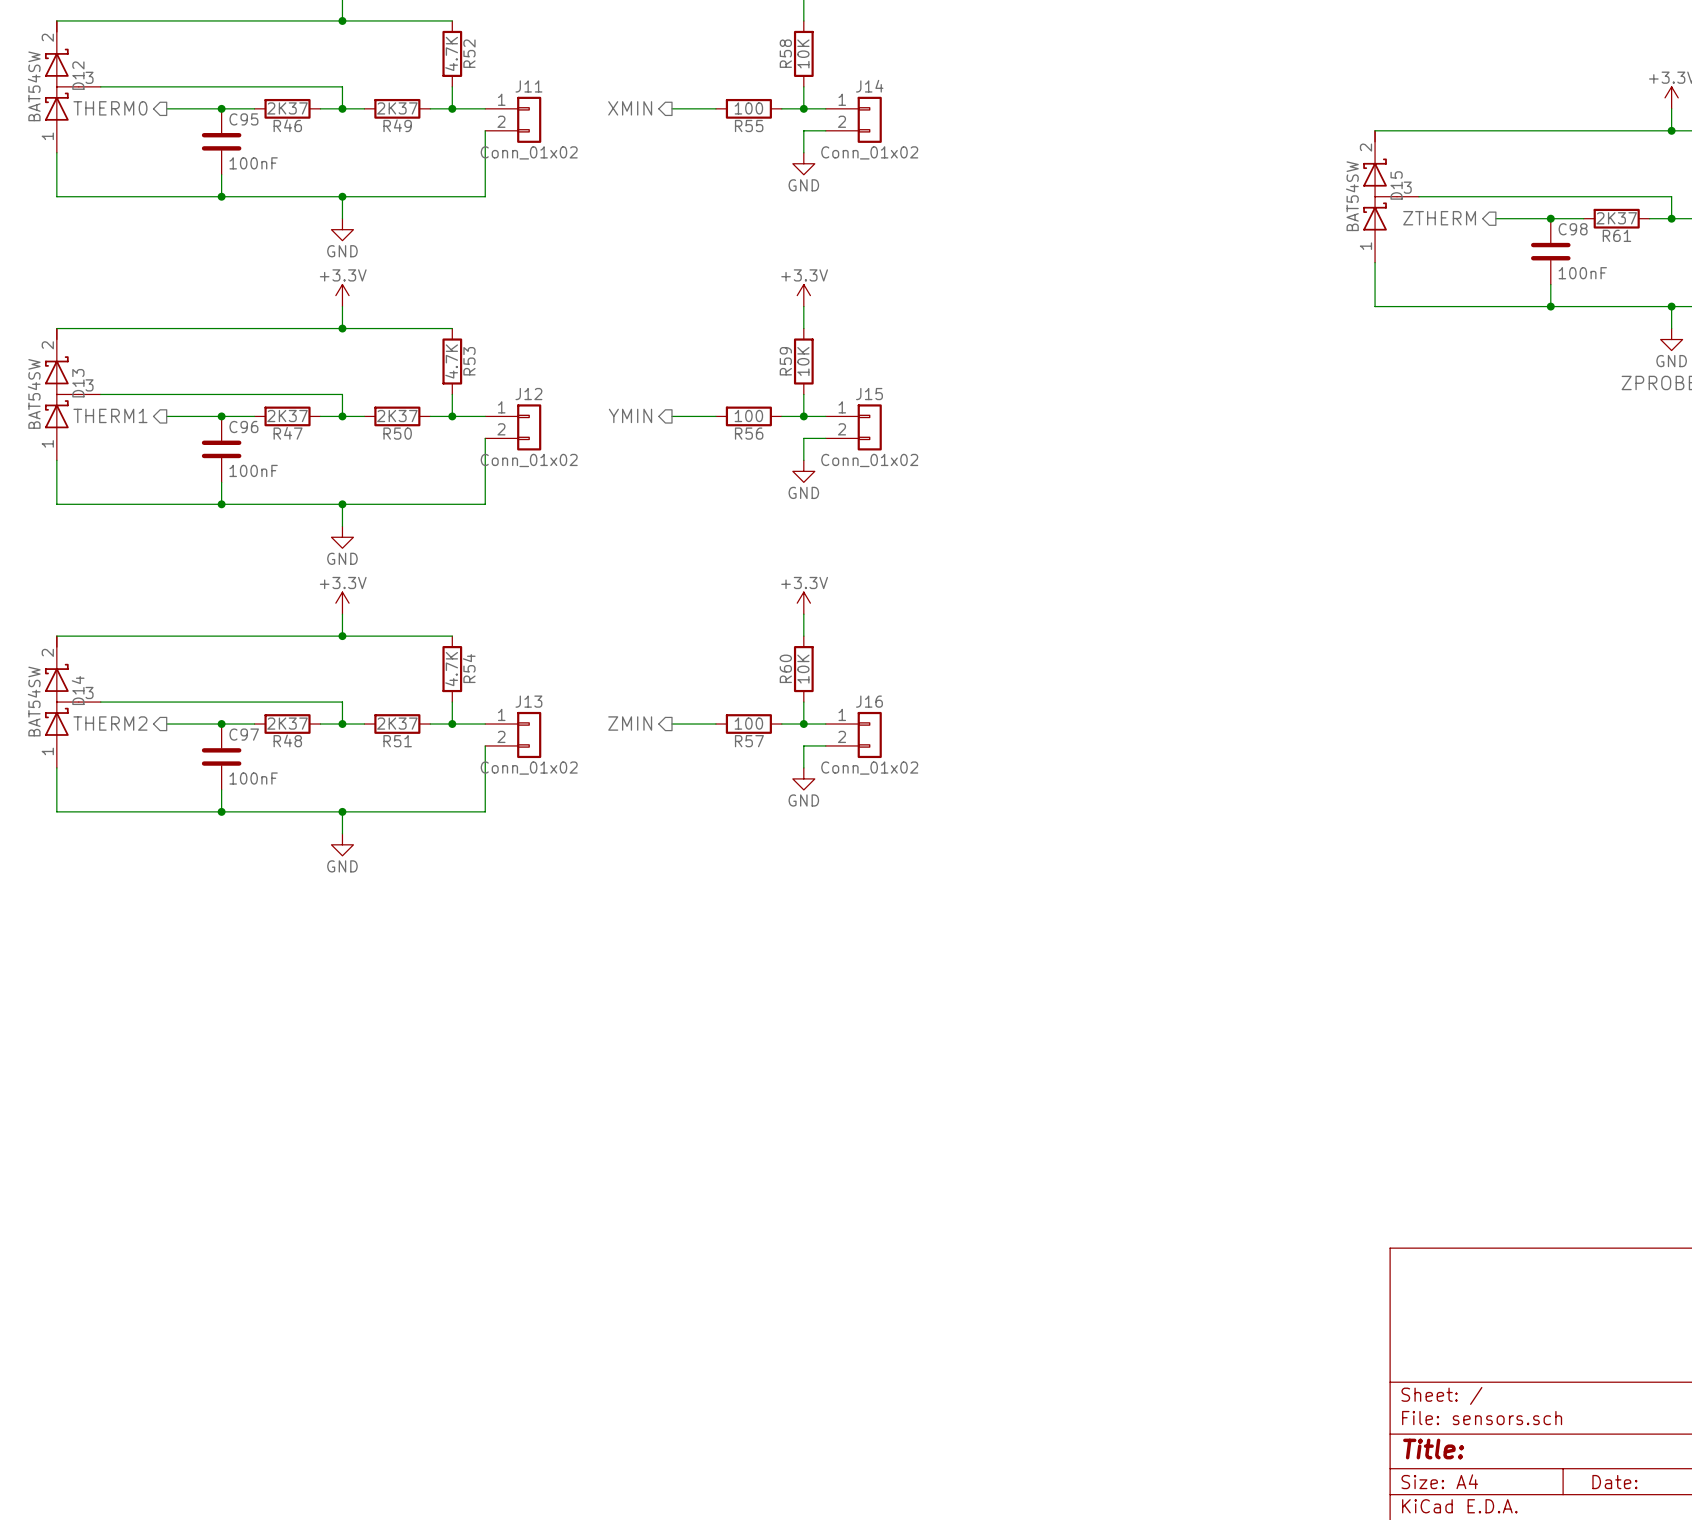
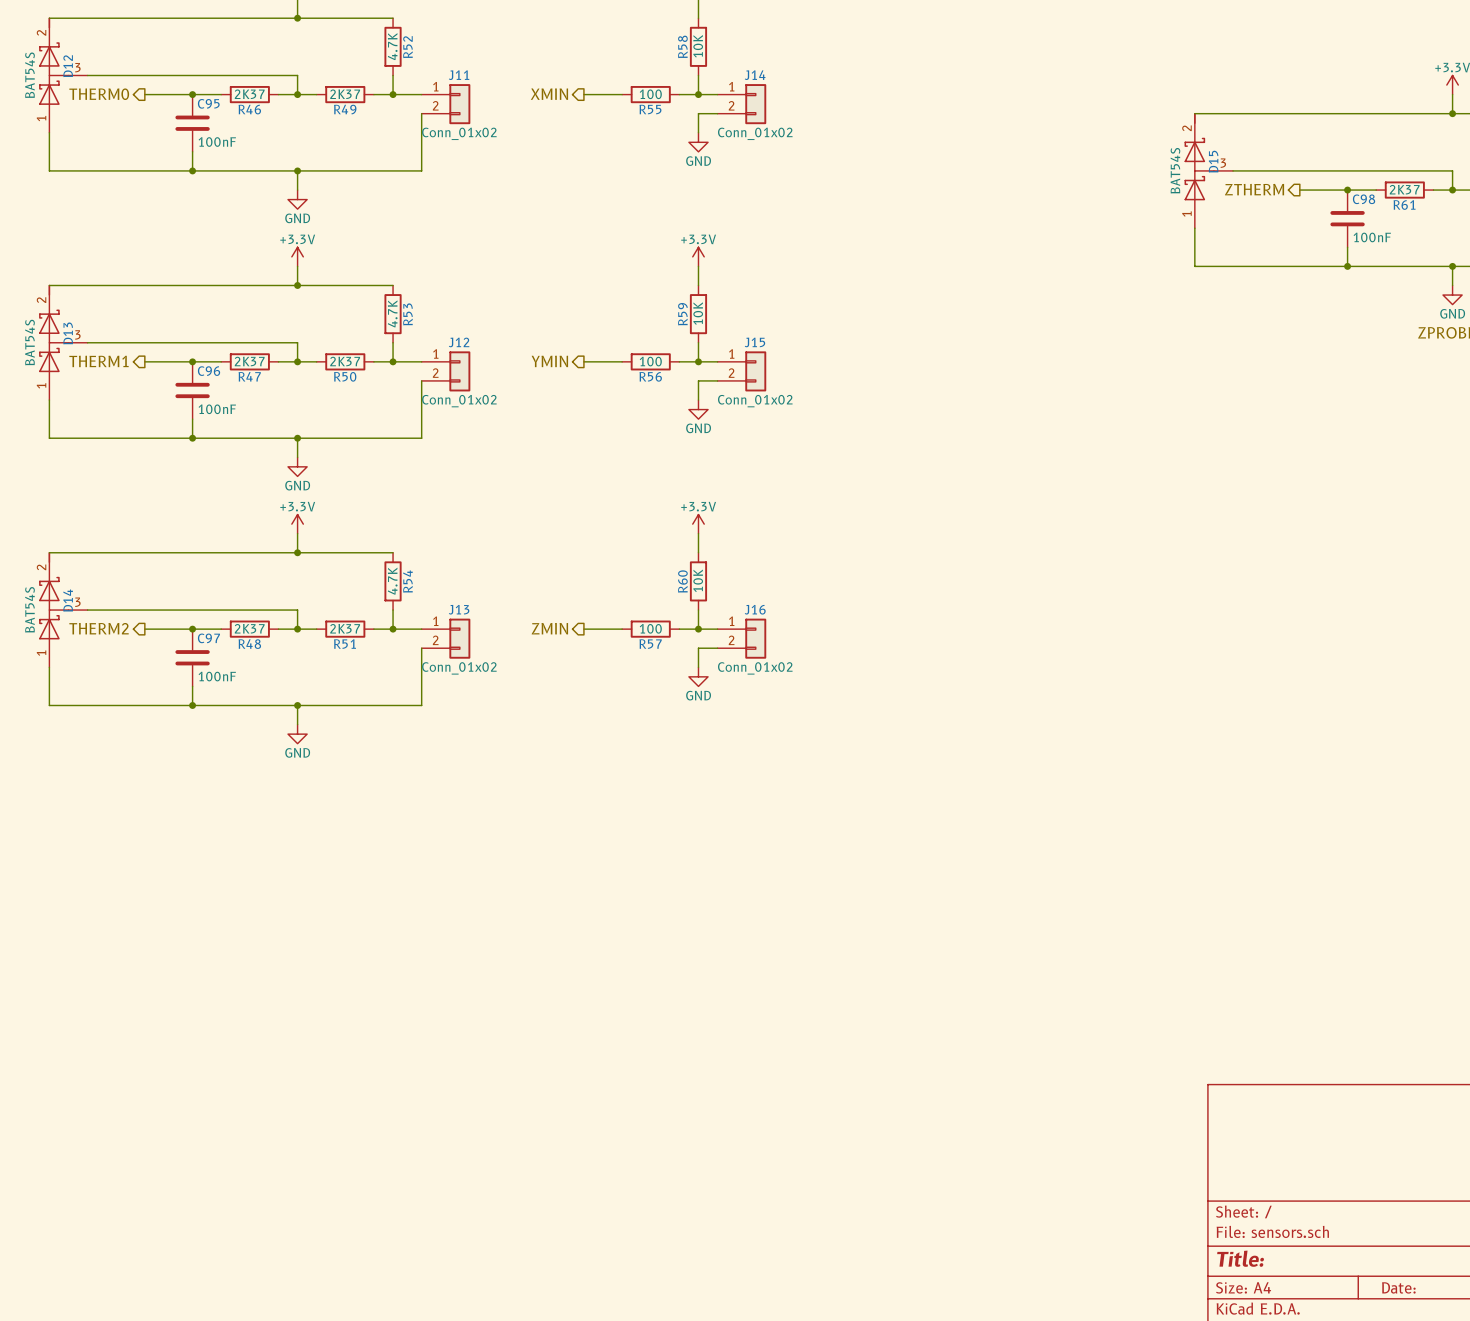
D12 value: BAT54SW (34, 86) -> BAT54S (30, 75)
D15 value: BAT54SW (1352, 196) -> BAT54S (1175, 170)
D13 value: BAT54SW (34, 393) -> BAT54S (30, 342)
D14 value: BAT54SW (34, 701) -> BAT54S (30, 609)

